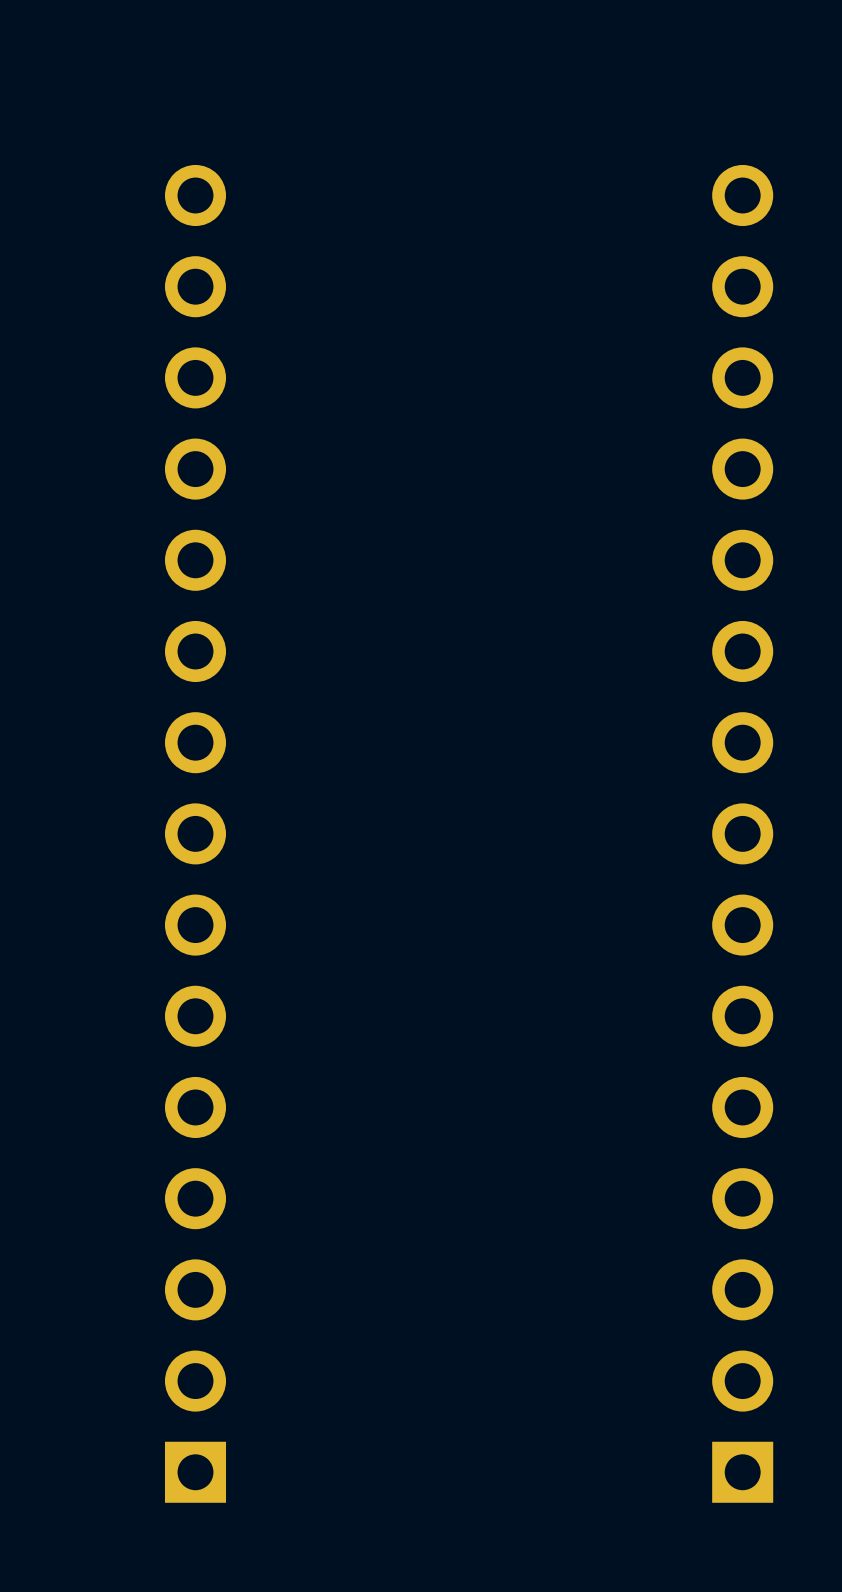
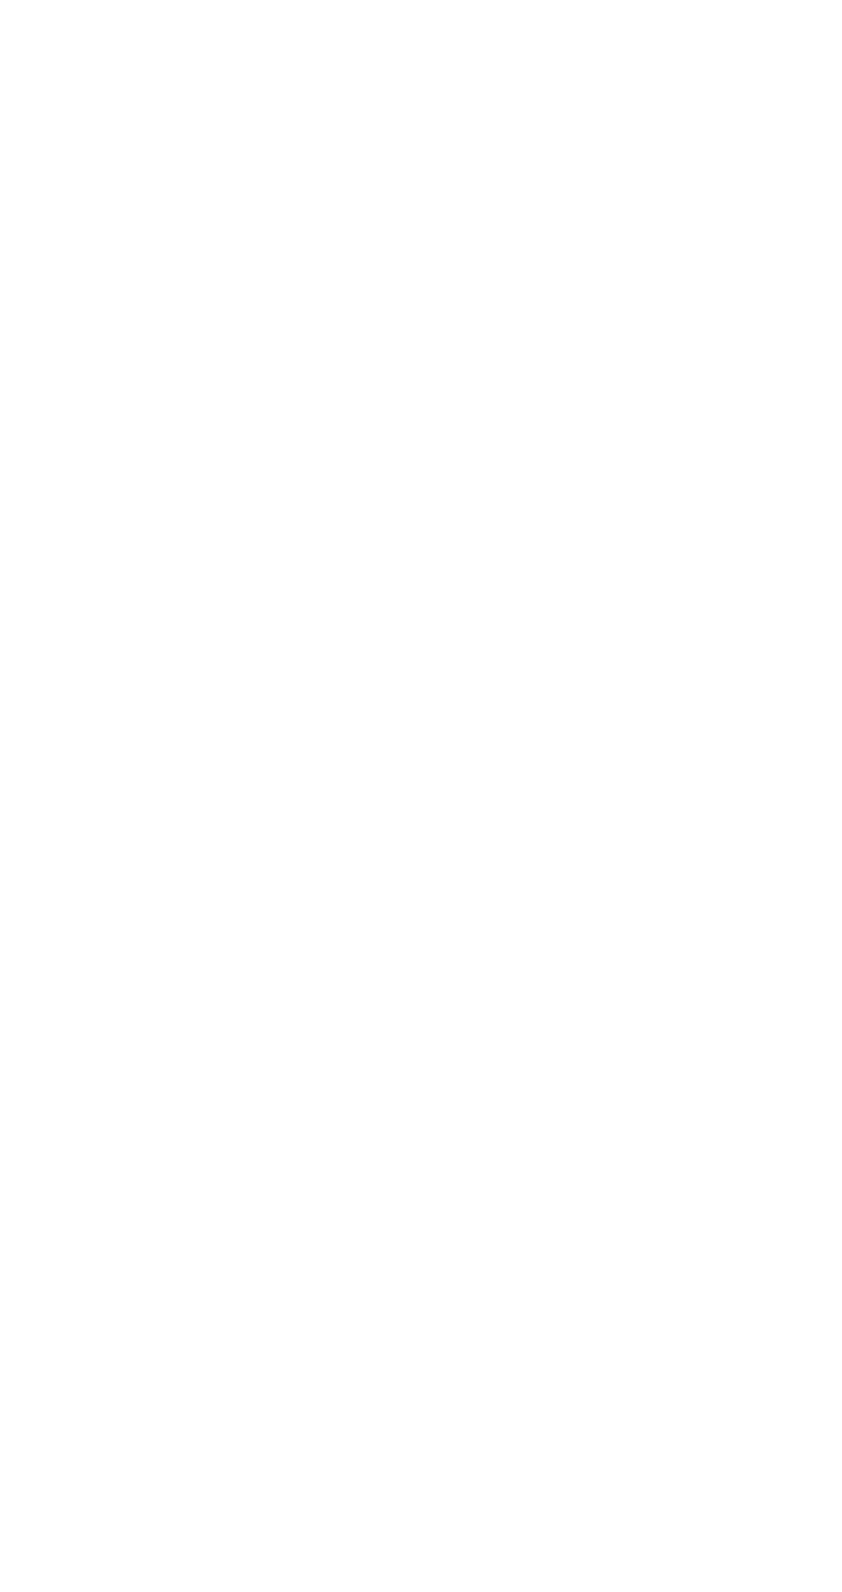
part: (195, 833) -> none
part: (742, 833) -> none

